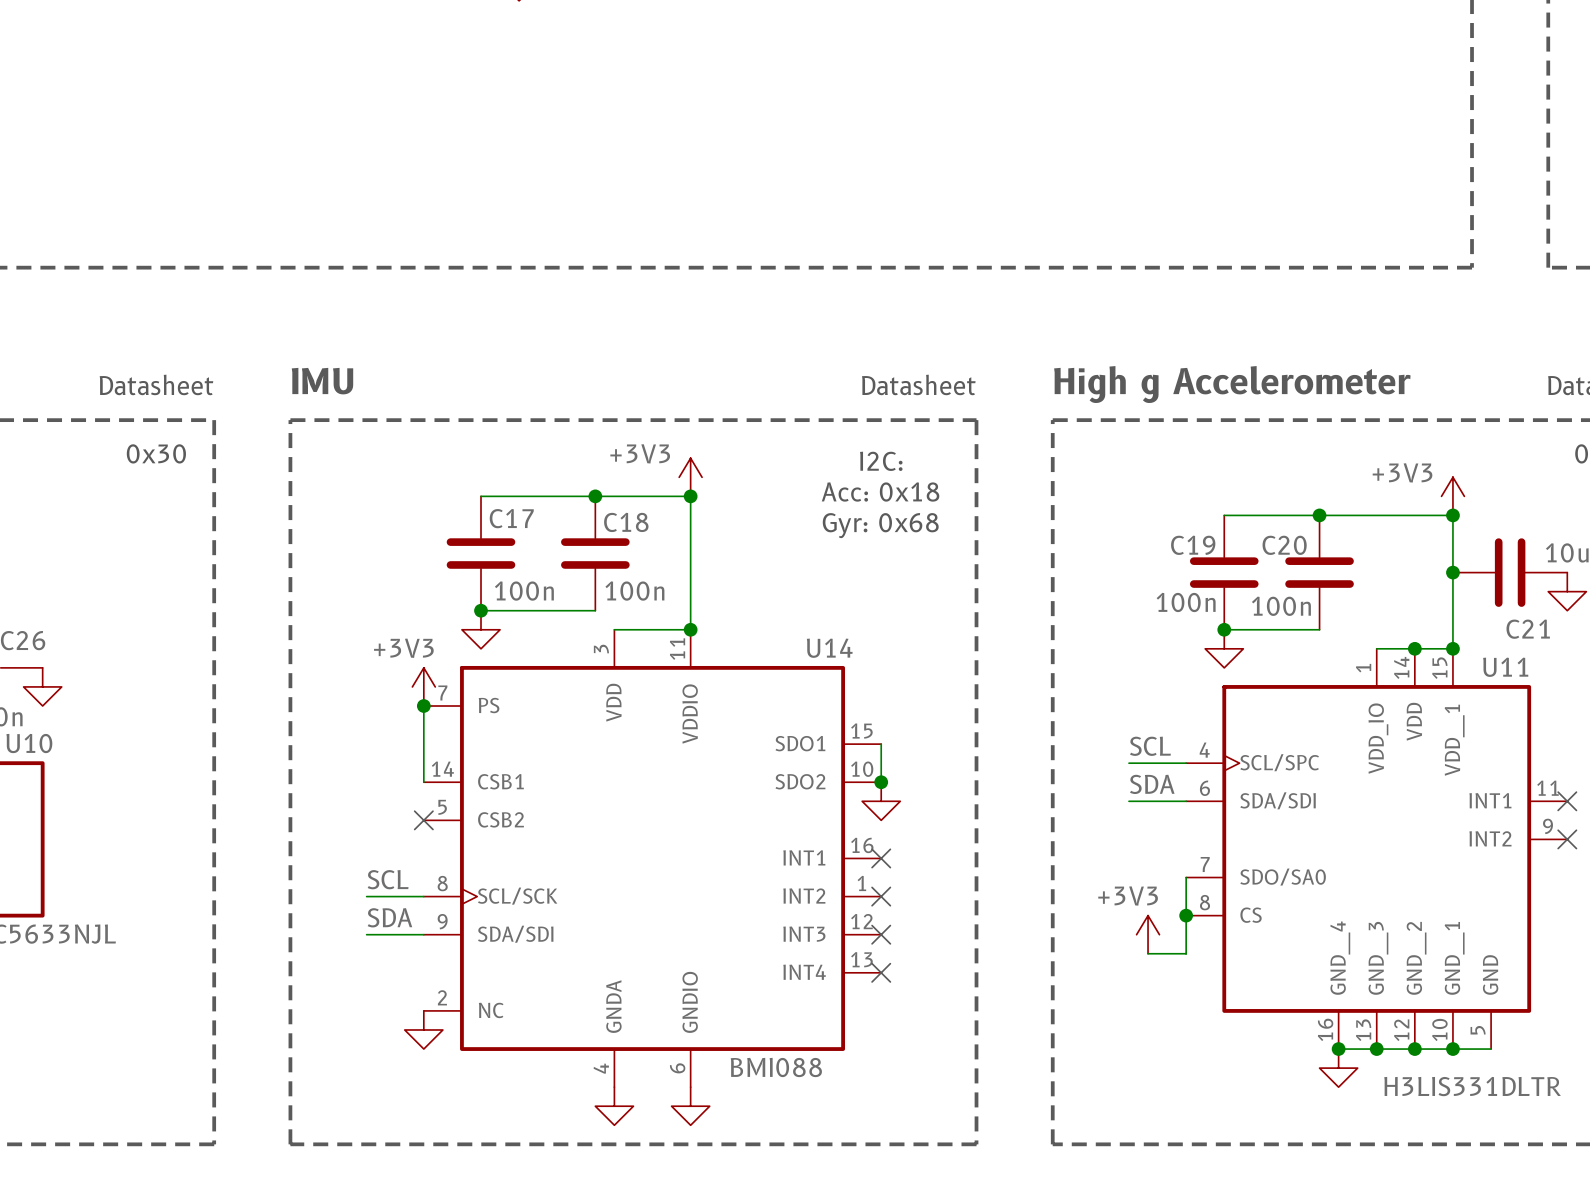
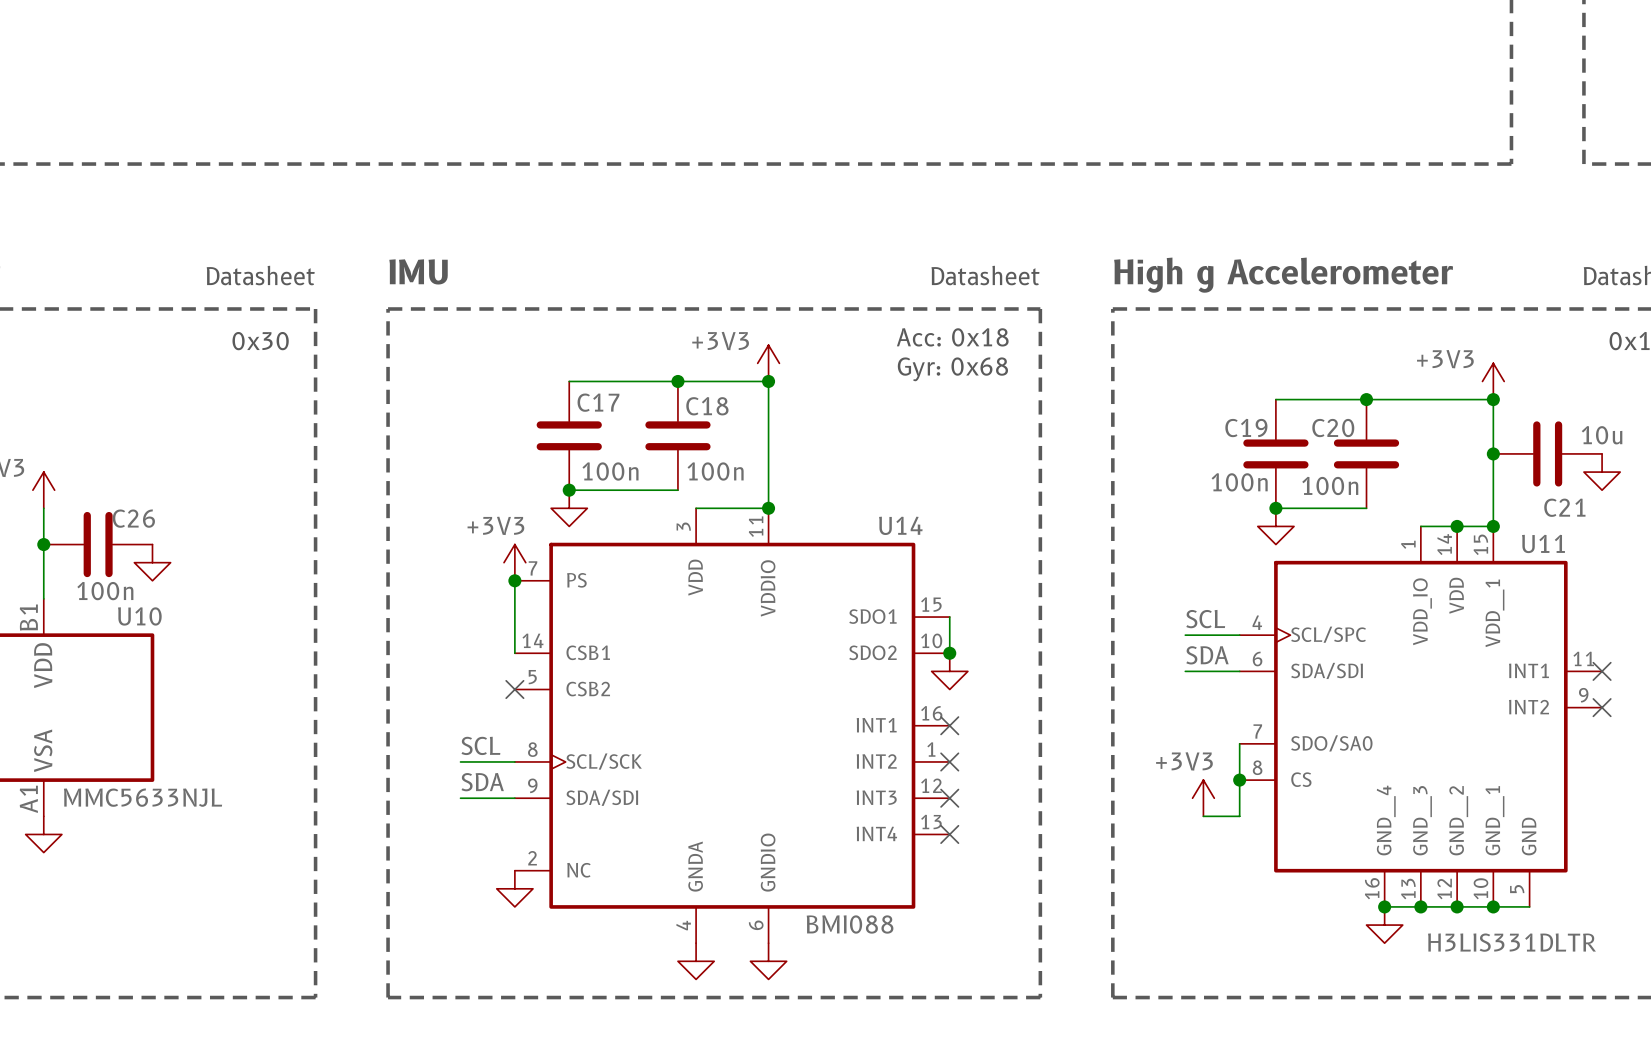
text: I2C: (881, 461) -> none
text position: Acc: 0x18 (880, 492) -> Acc: 0x18 (952, 337)
text position: Gyr: 0x68 (880, 525) -> Gyr: 0x68 (952, 369)

